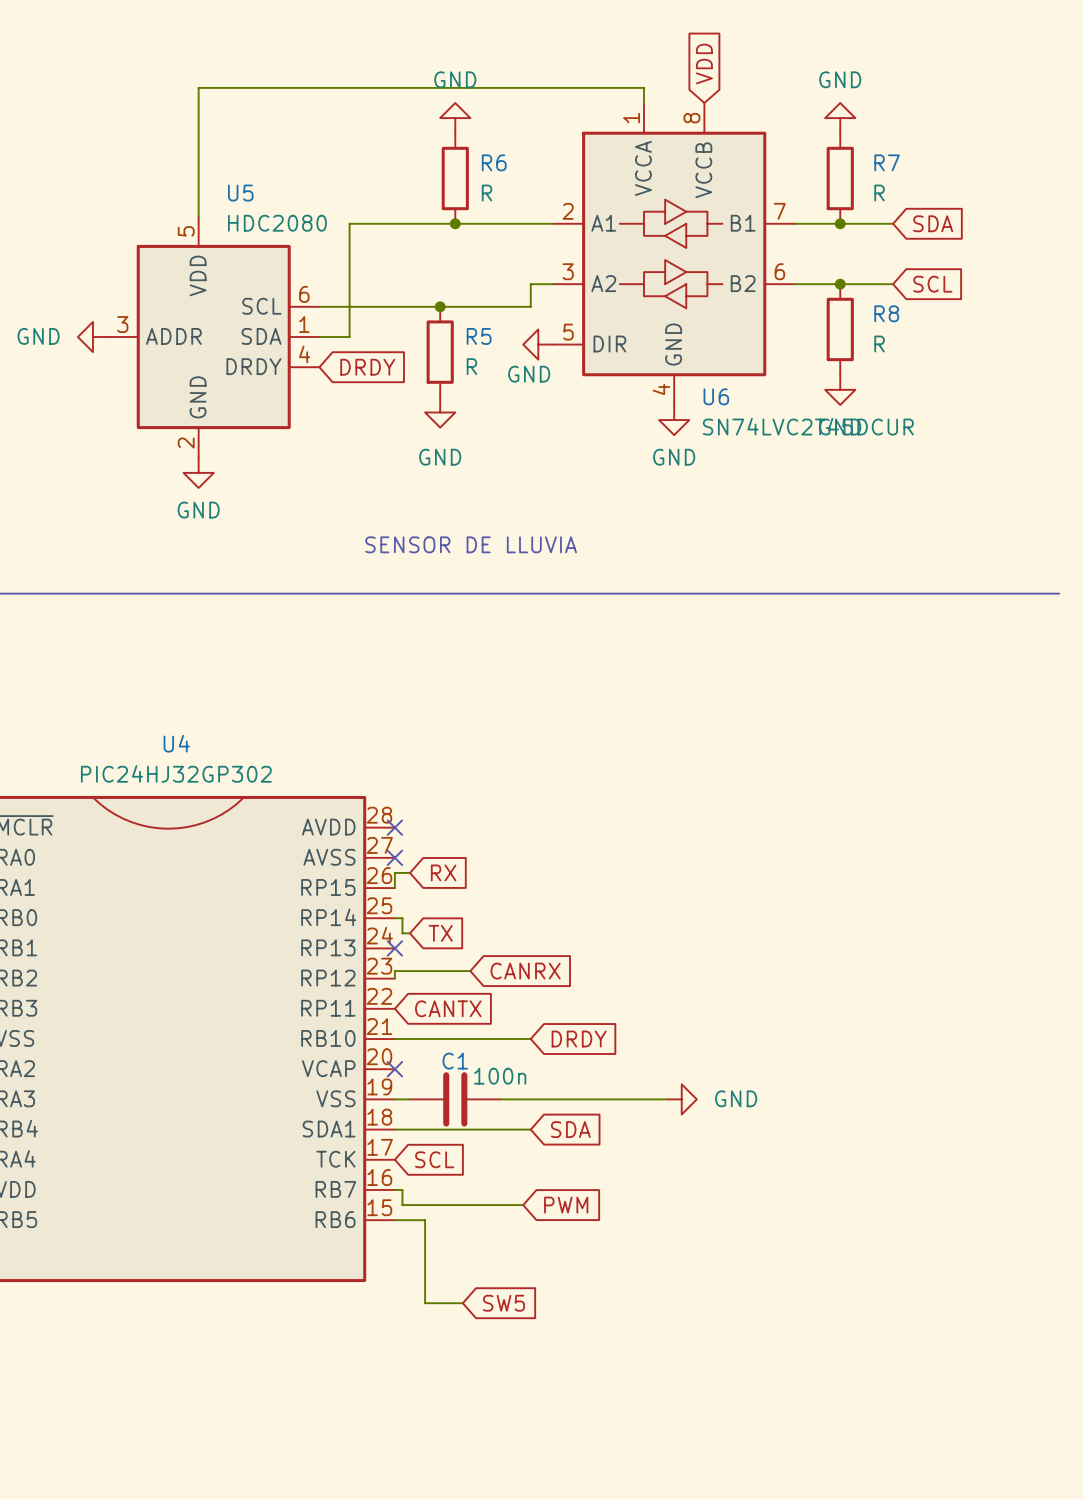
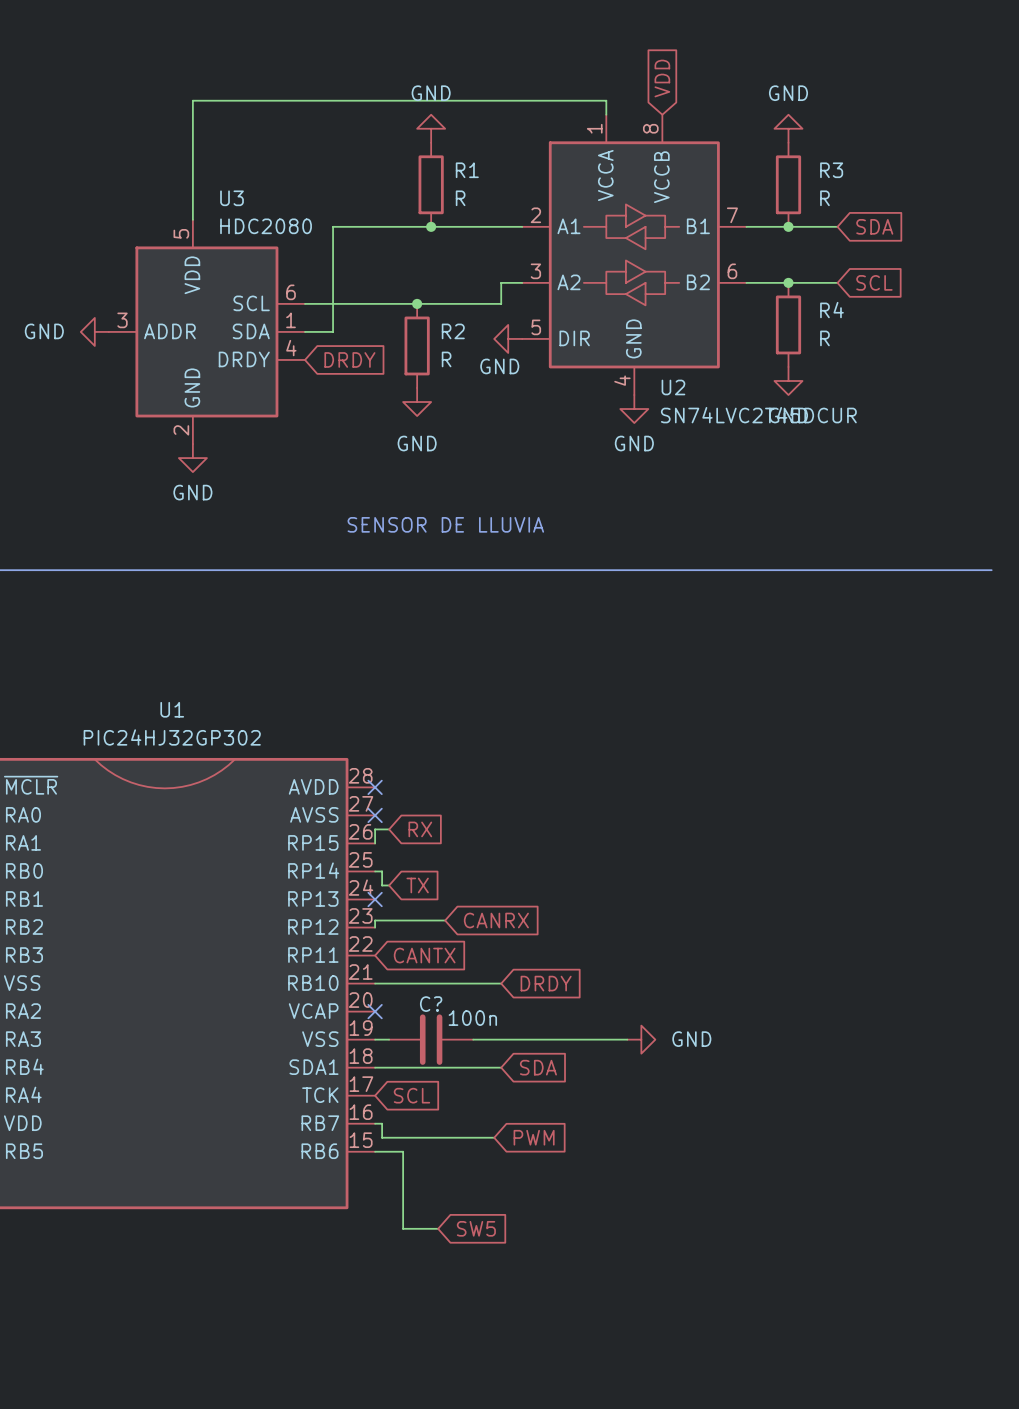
R6 name: R6 (494, 162) -> R1 (467, 170)
R7 name: R7 (887, 162) -> R3 (831, 170)
U5 name: U5 (240, 193) -> U3 (232, 198)
R8 name: R8 (886, 313) -> R4 (831, 310)
R5 name: R5 (479, 336) -> R2 (453, 331)
U6 name: U6 (716, 396) -> U2 (673, 387)
U4 name: U4 (176, 743) -> U1 (172, 709)
C1 name: C1 (455, 1061) -> C? (431, 1004)

